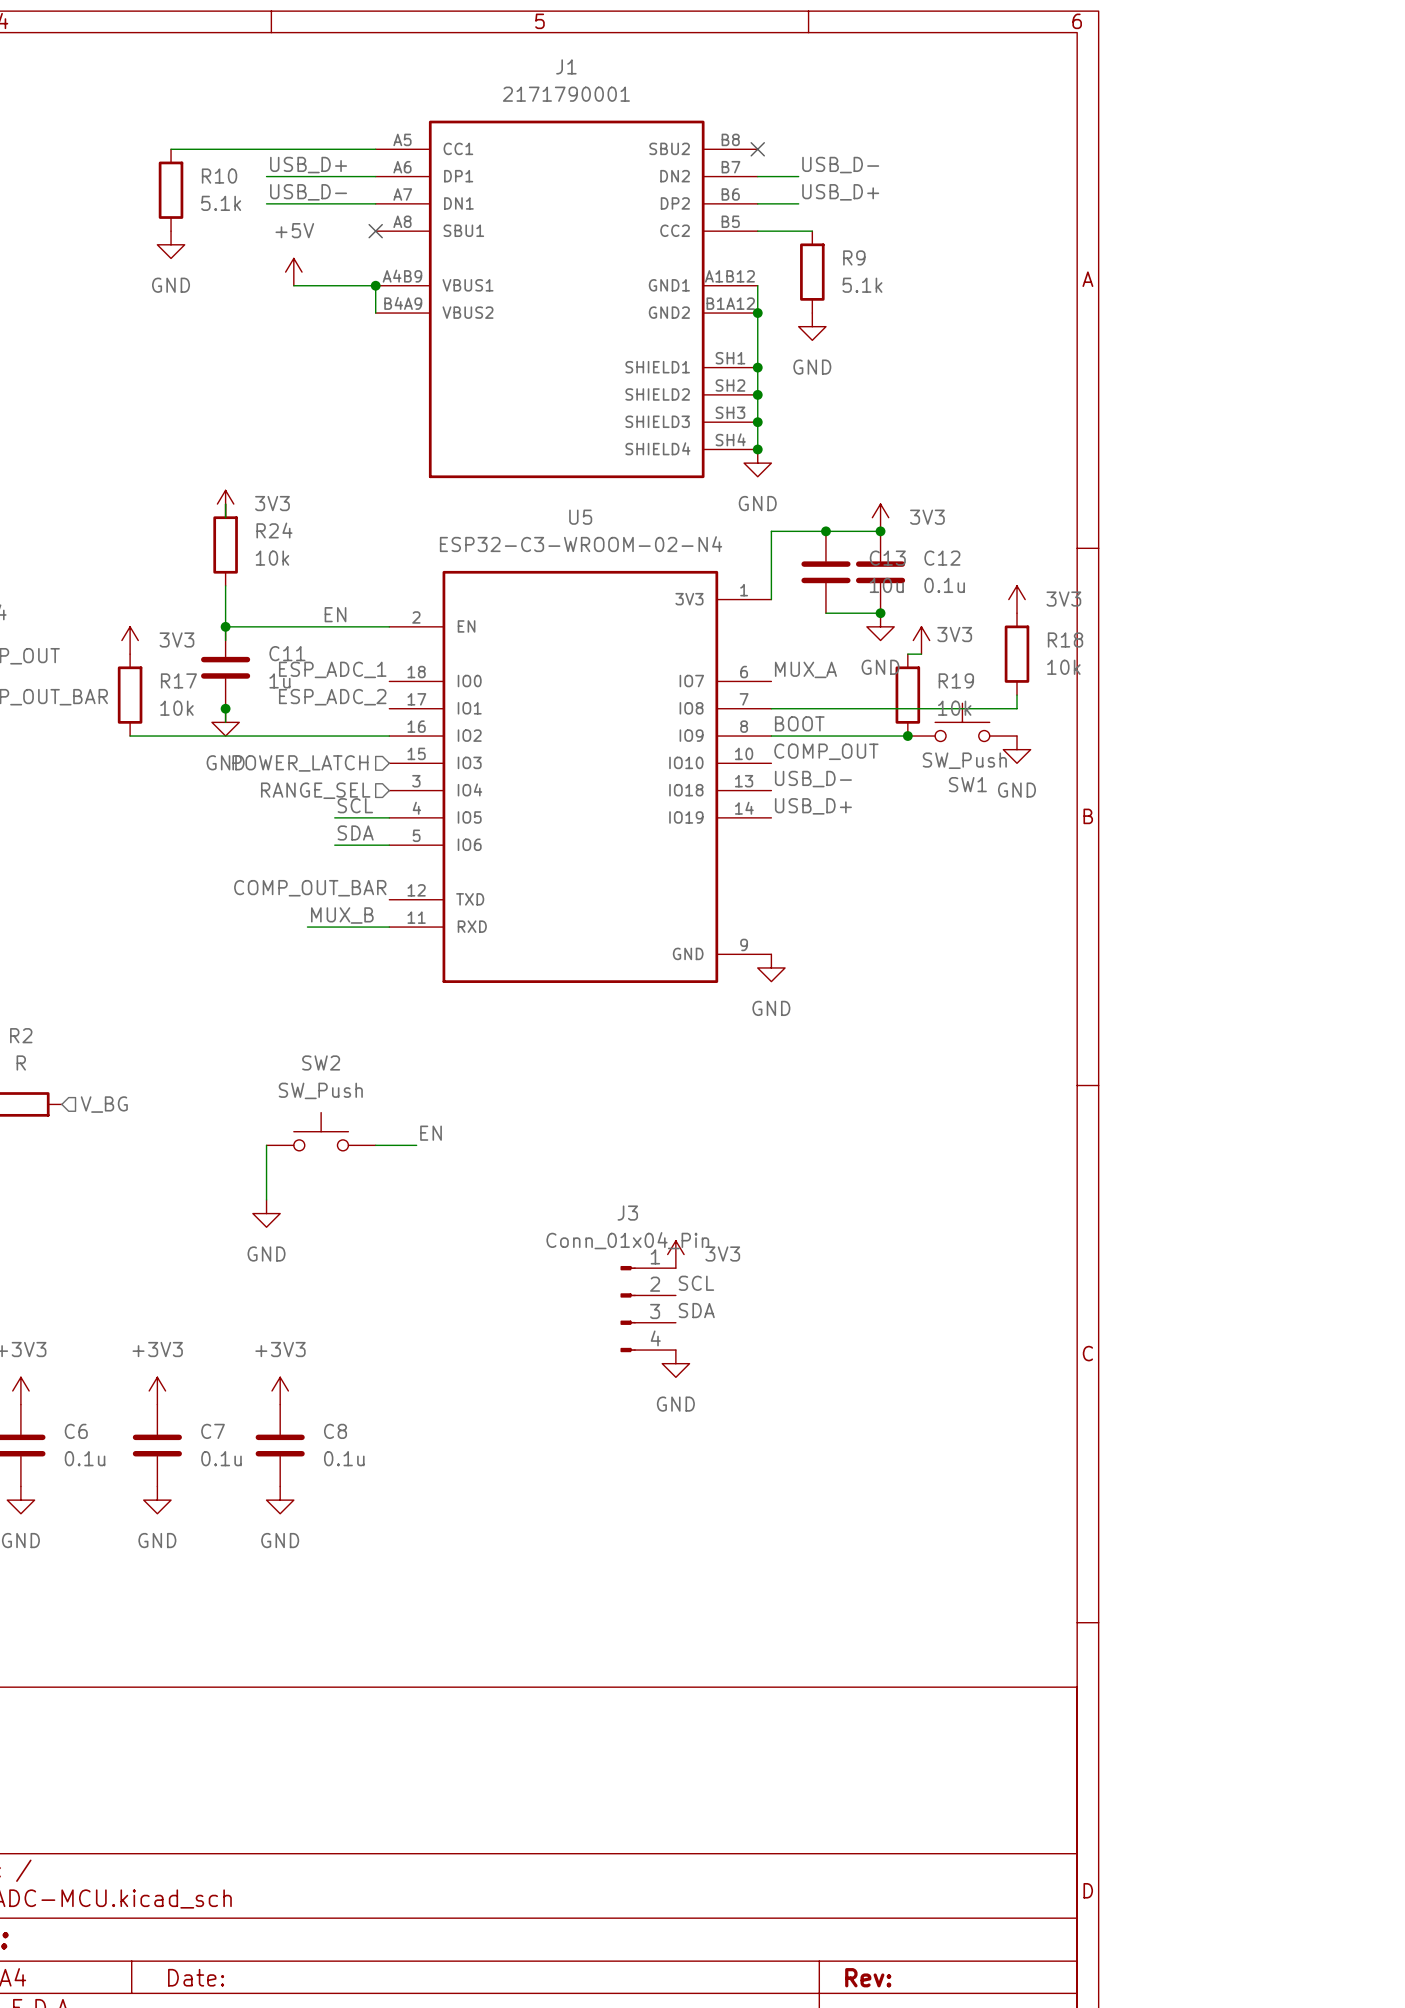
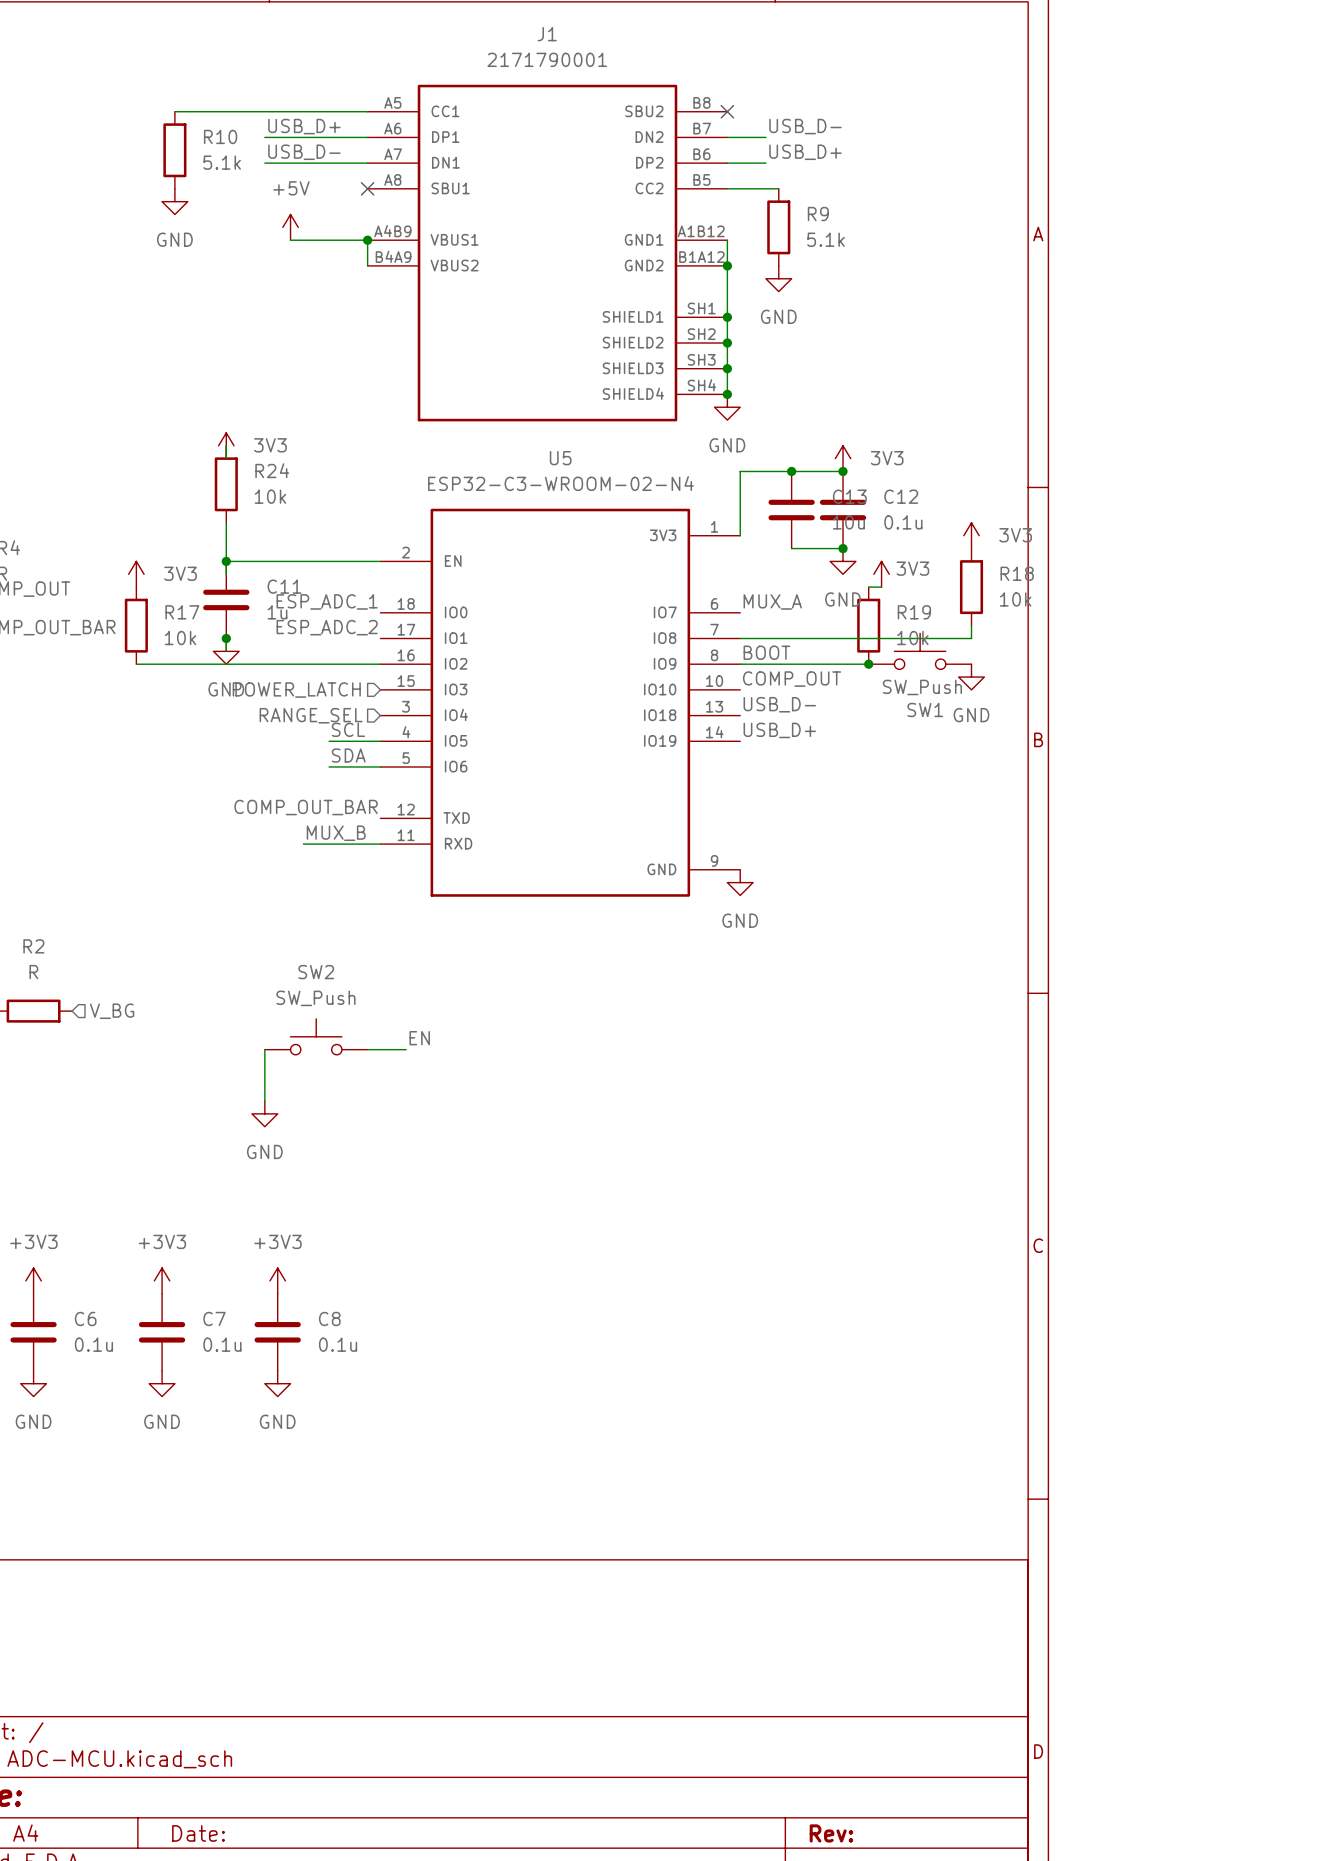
label: EN (335, 614) -> none
power symbol: 3V3 (675, 1254) -> none
label: SCL (696, 1283) -> none
J3: Conn_01x04_Pin (648, 1309) -> none
label: SDA (696, 1310) -> none
power symbol: GND (675, 1363) -> none

